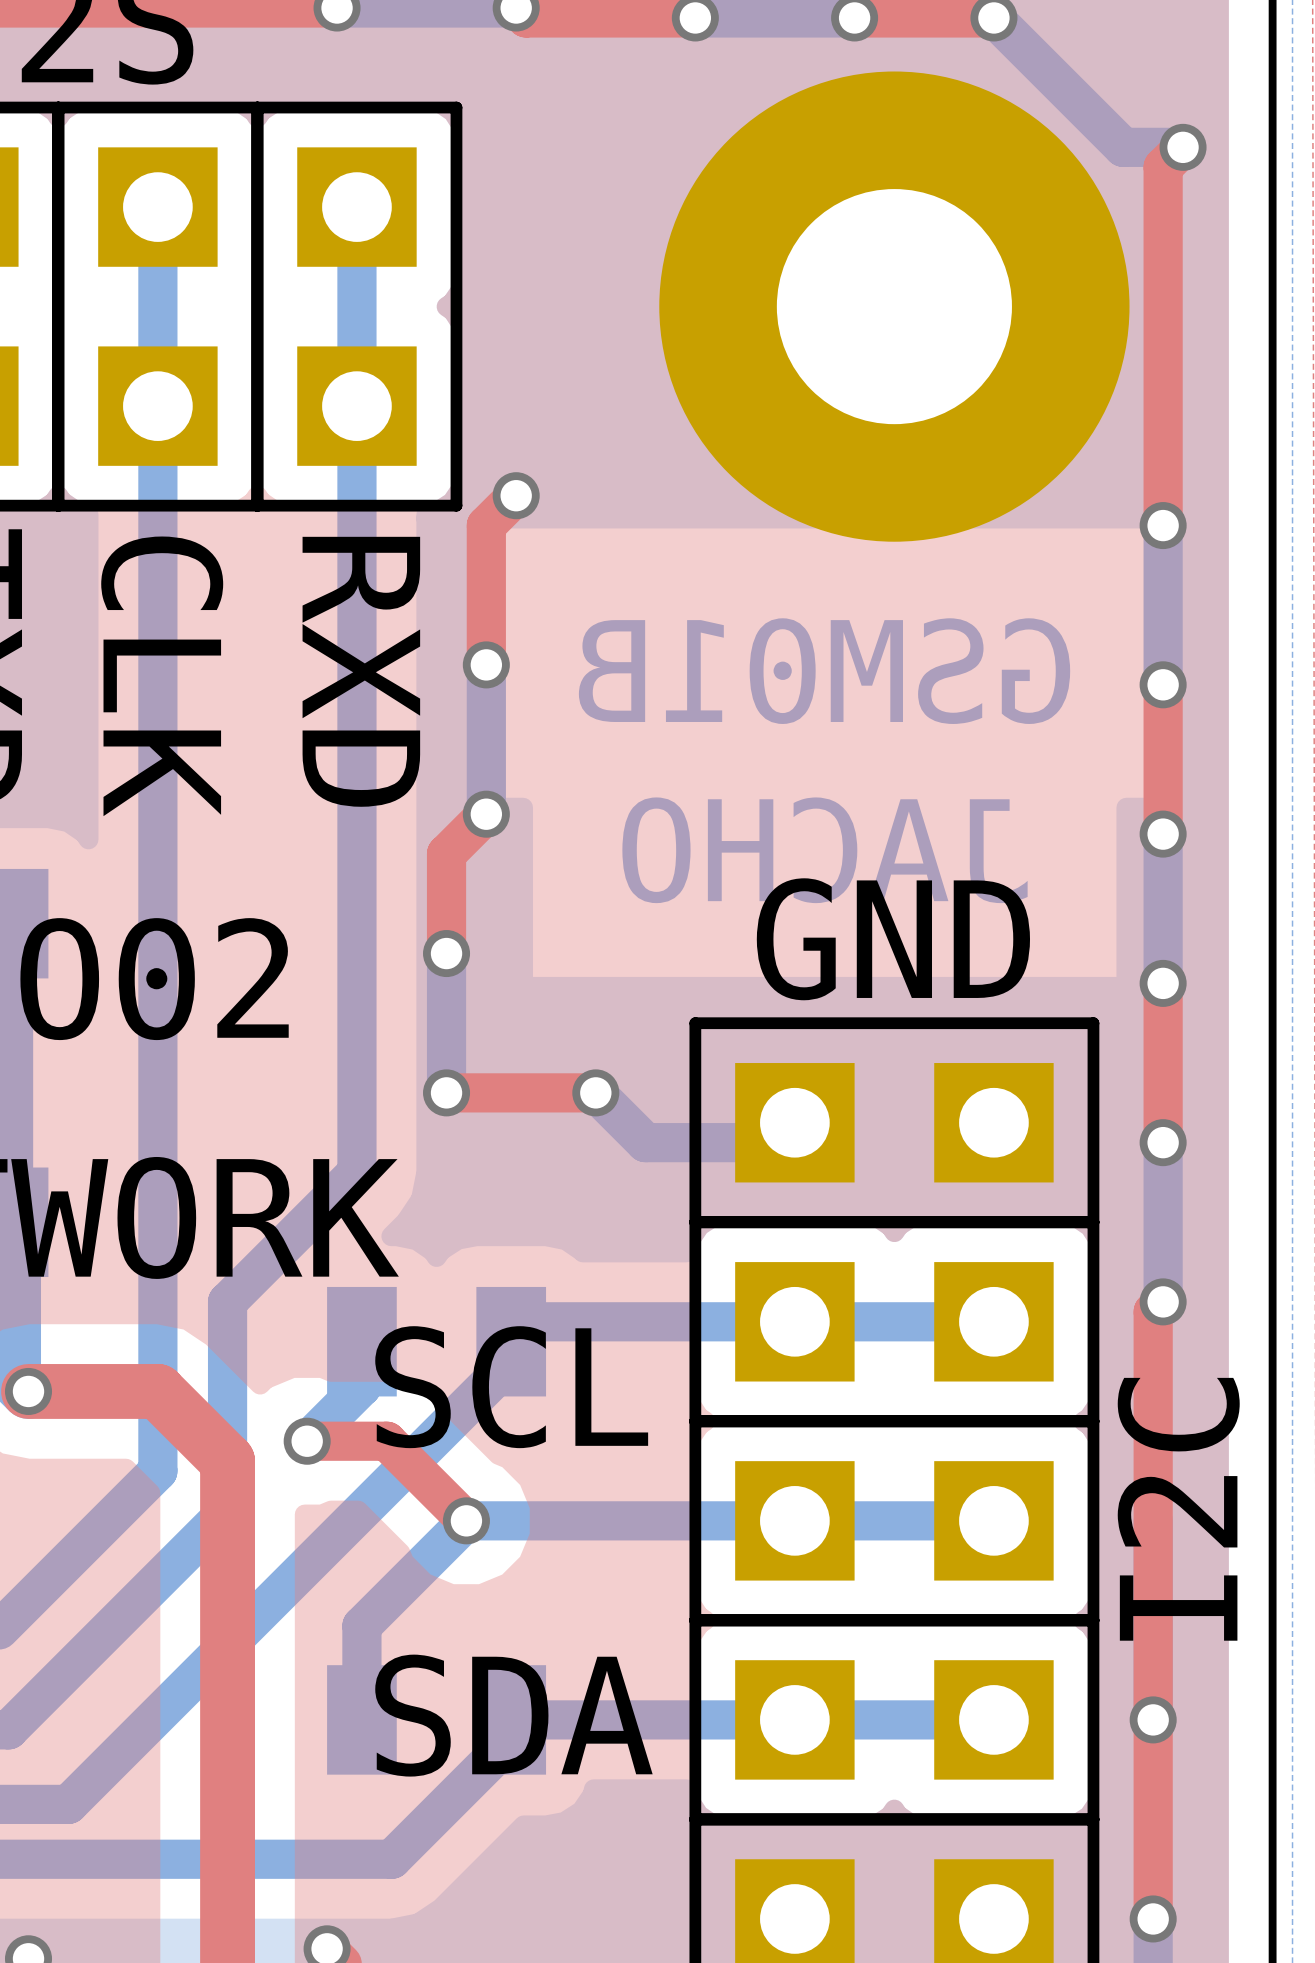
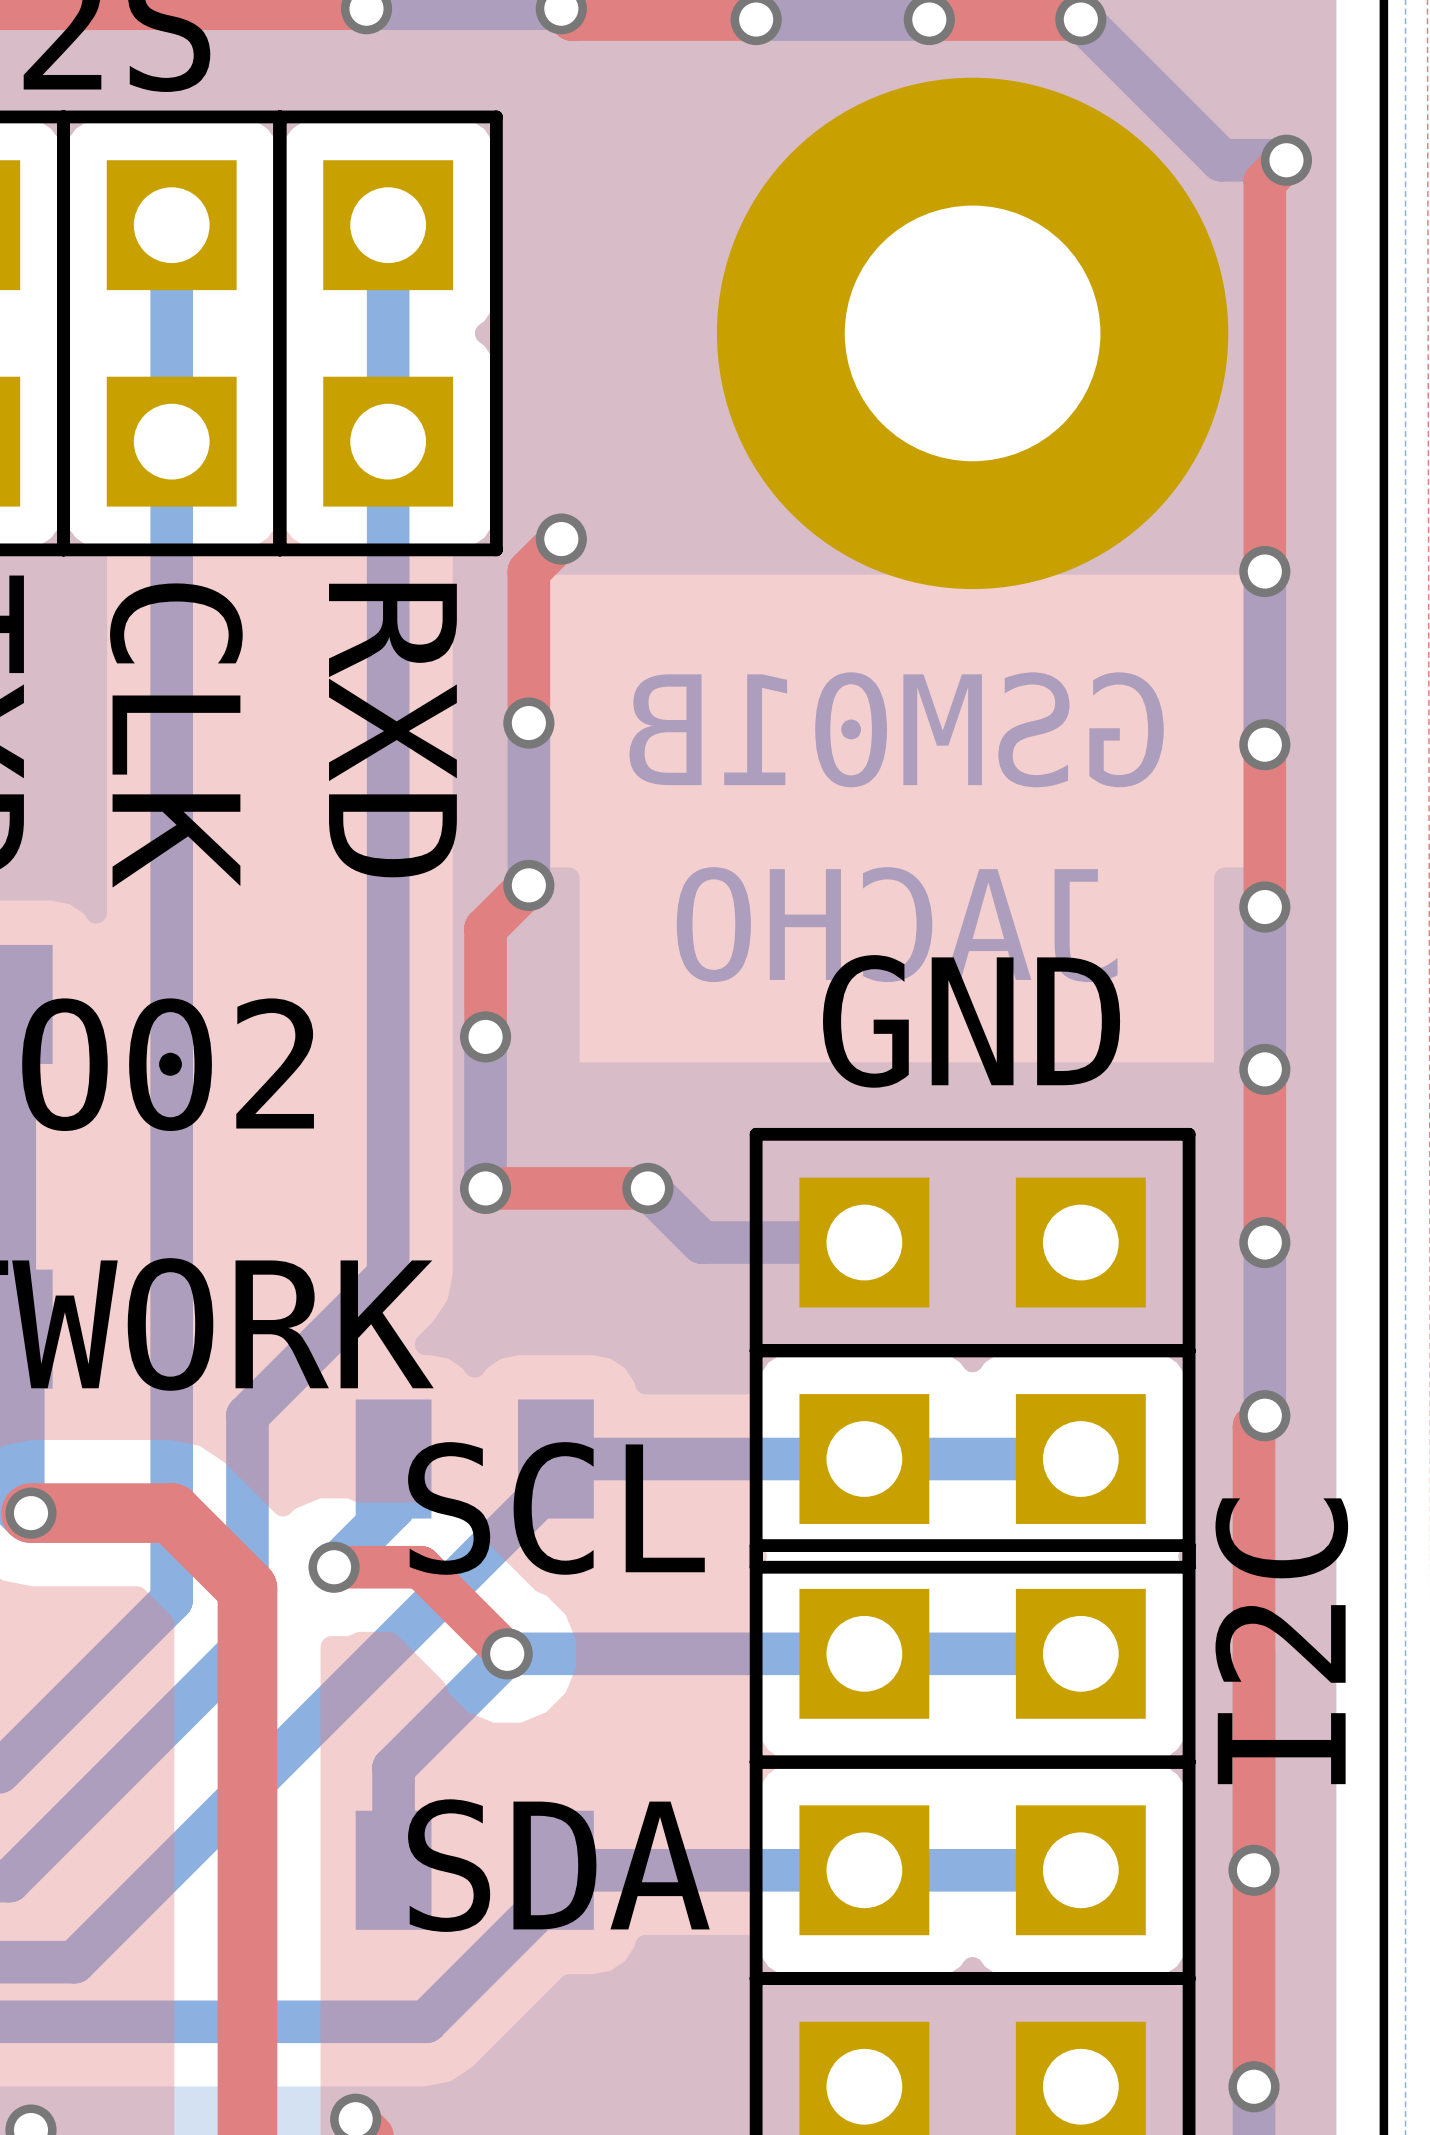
part position: (894, 1122) -> (972, 1242)
part position: (894, 1321) -> (972, 1459)
bottom track: (993, 1321) (531, 1321) (511, 1341) -> (1080, 1459) (555, 1459)

